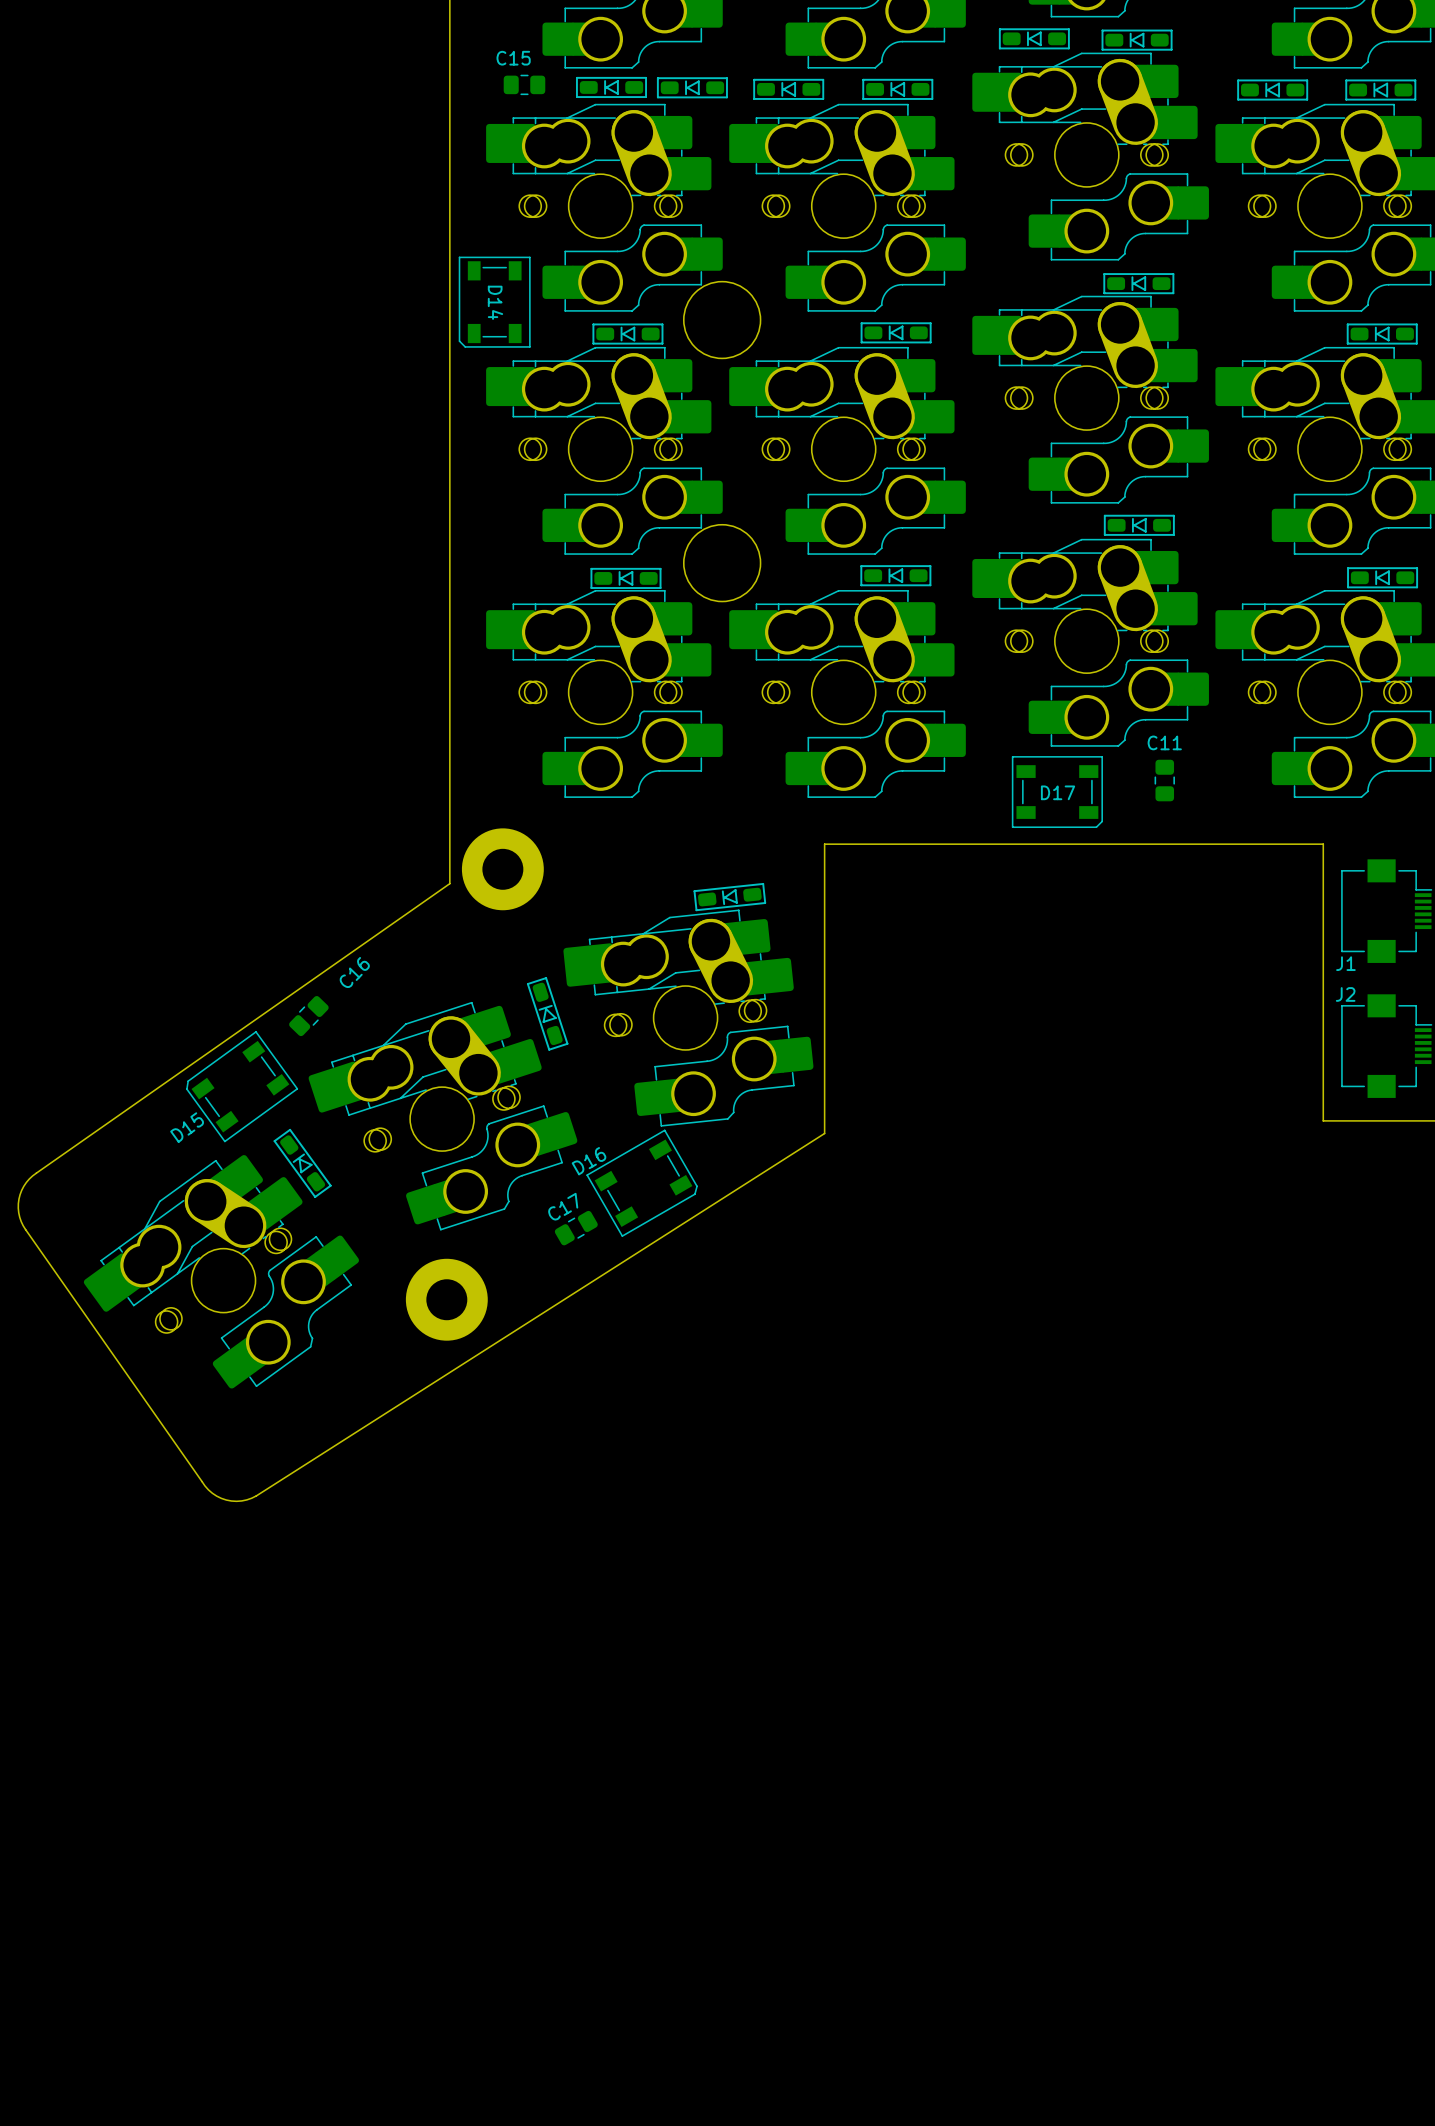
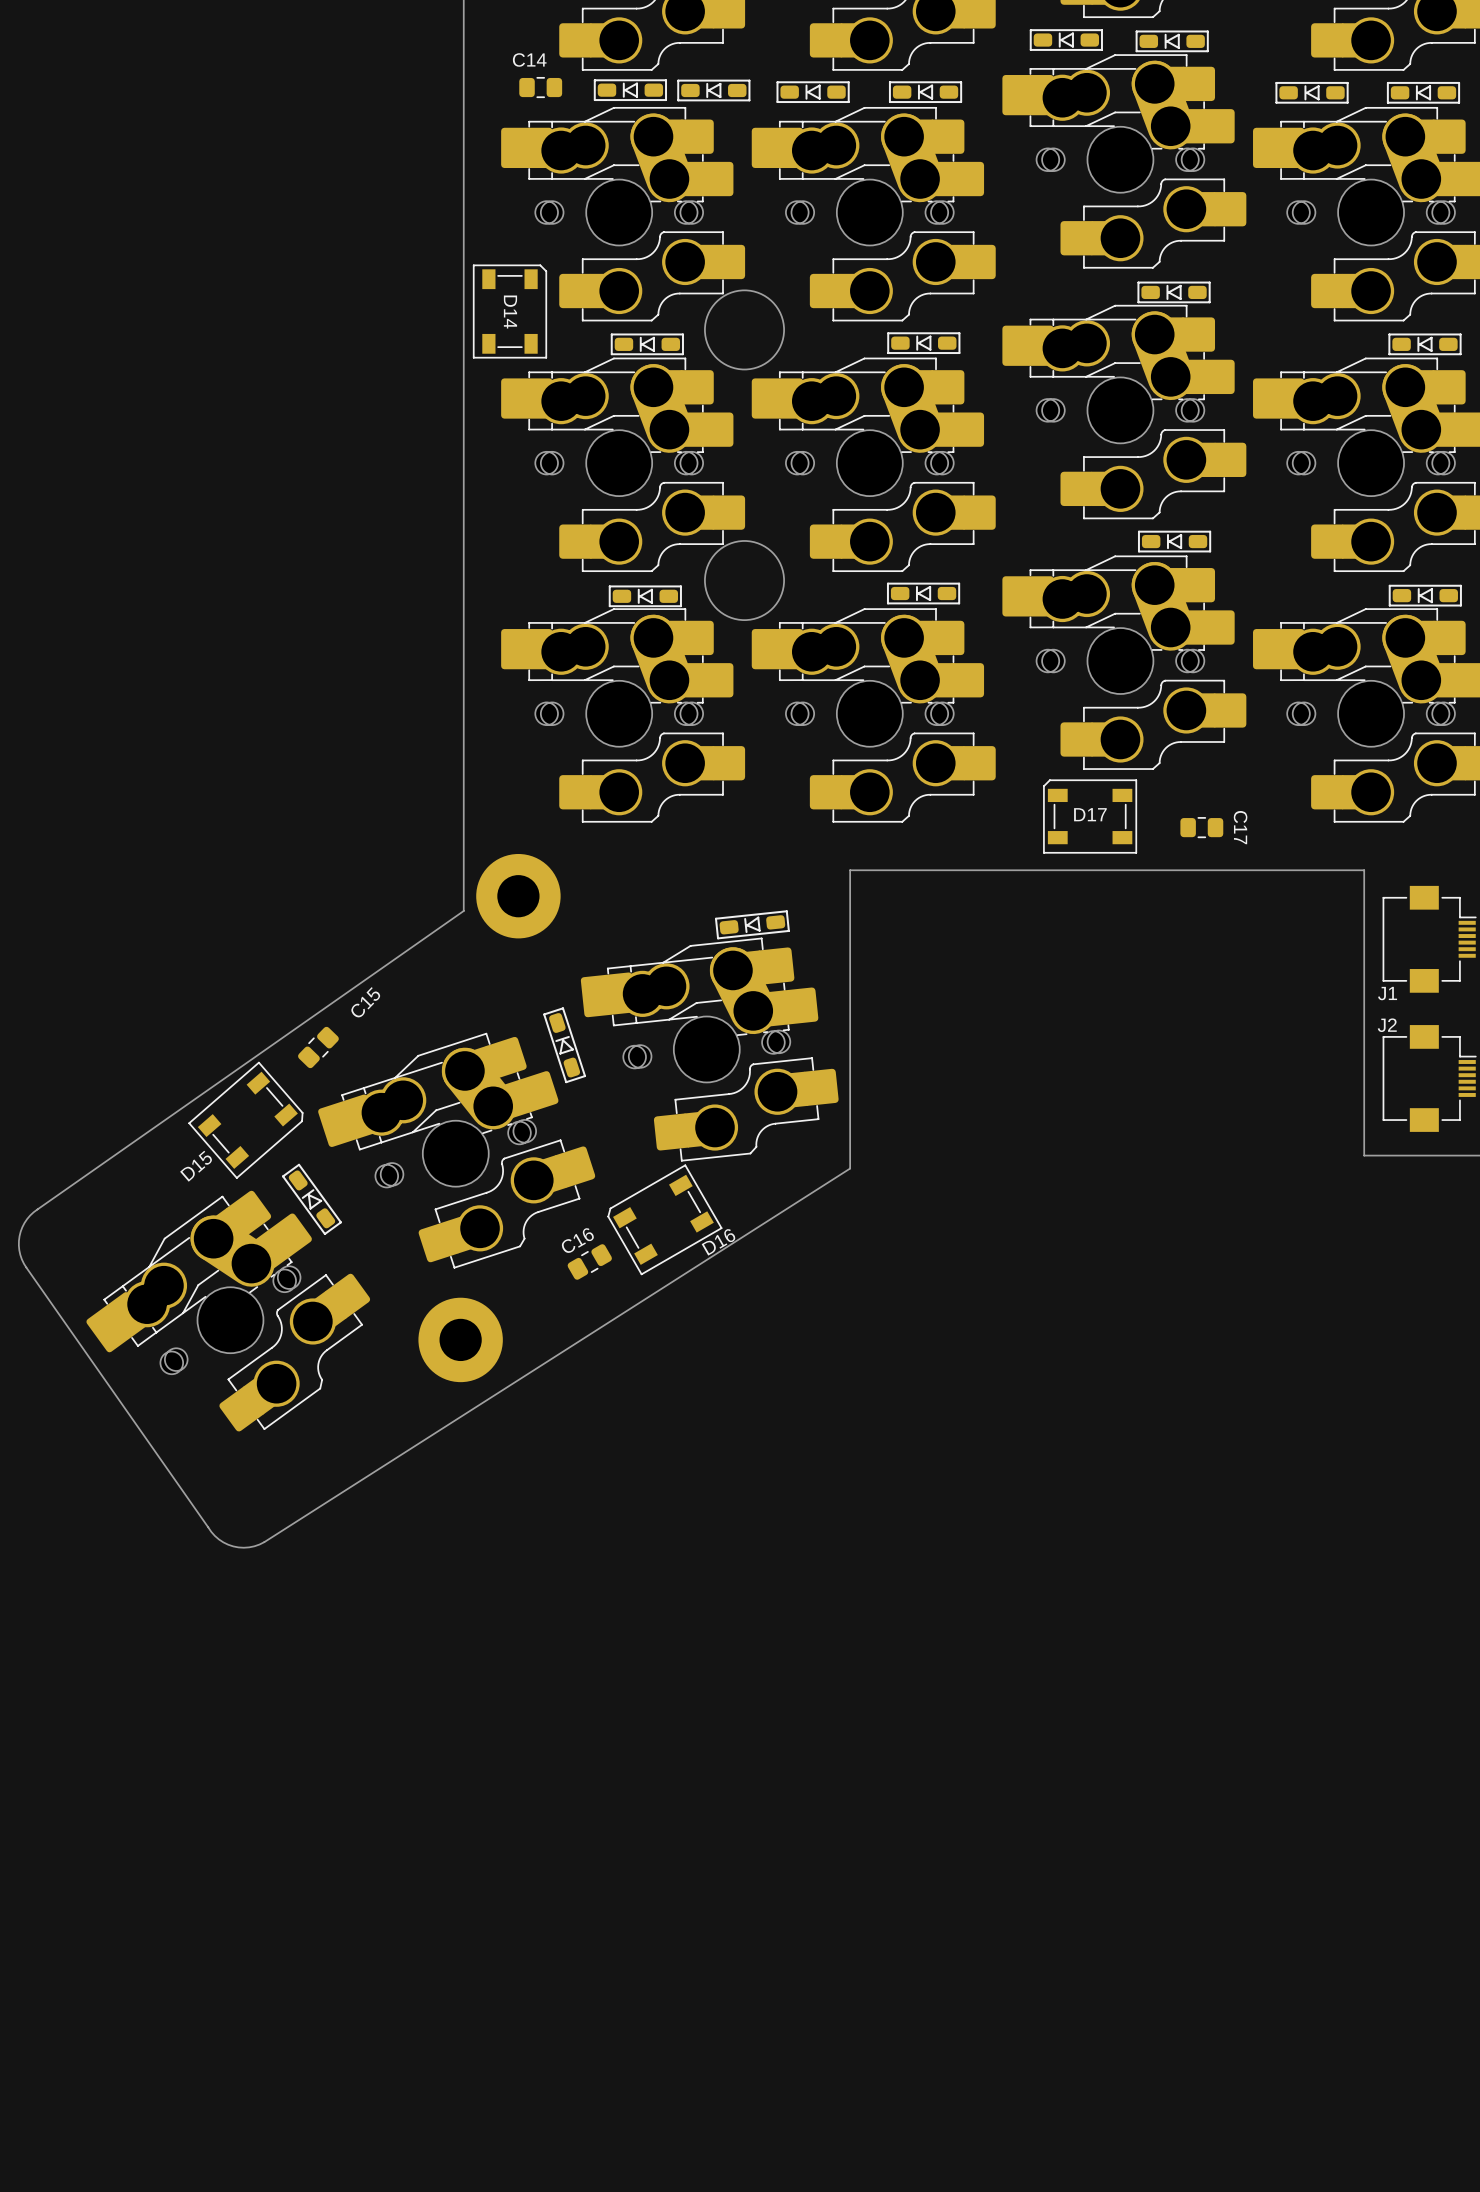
C15 name: C15 (513, 58) -> C14 (529, 59)
D14 rotation: 0° (494, 302) -> 180° (509, 311)
C11: (1164, 780) -> none
D17 rotation: 0° (1057, 792) -> 180° (1090, 816)
C16 name: C16 (354, 972) -> C15 (365, 1002)
D15 rotation: 0° (242, 1086) -> 175° clockwise (245, 1120)
D16 rotation: 0° (642, 1183) -> 180° (664, 1219)
C17 name position: C17 (563, 1206) -> C17 (1240, 827)
C16: none -> (589, 1261)
C17 rotation: 0° (576, 1228) -> 30° clockwise (1201, 827)
C17 position: (576, 1228) -> (1201, 827)

